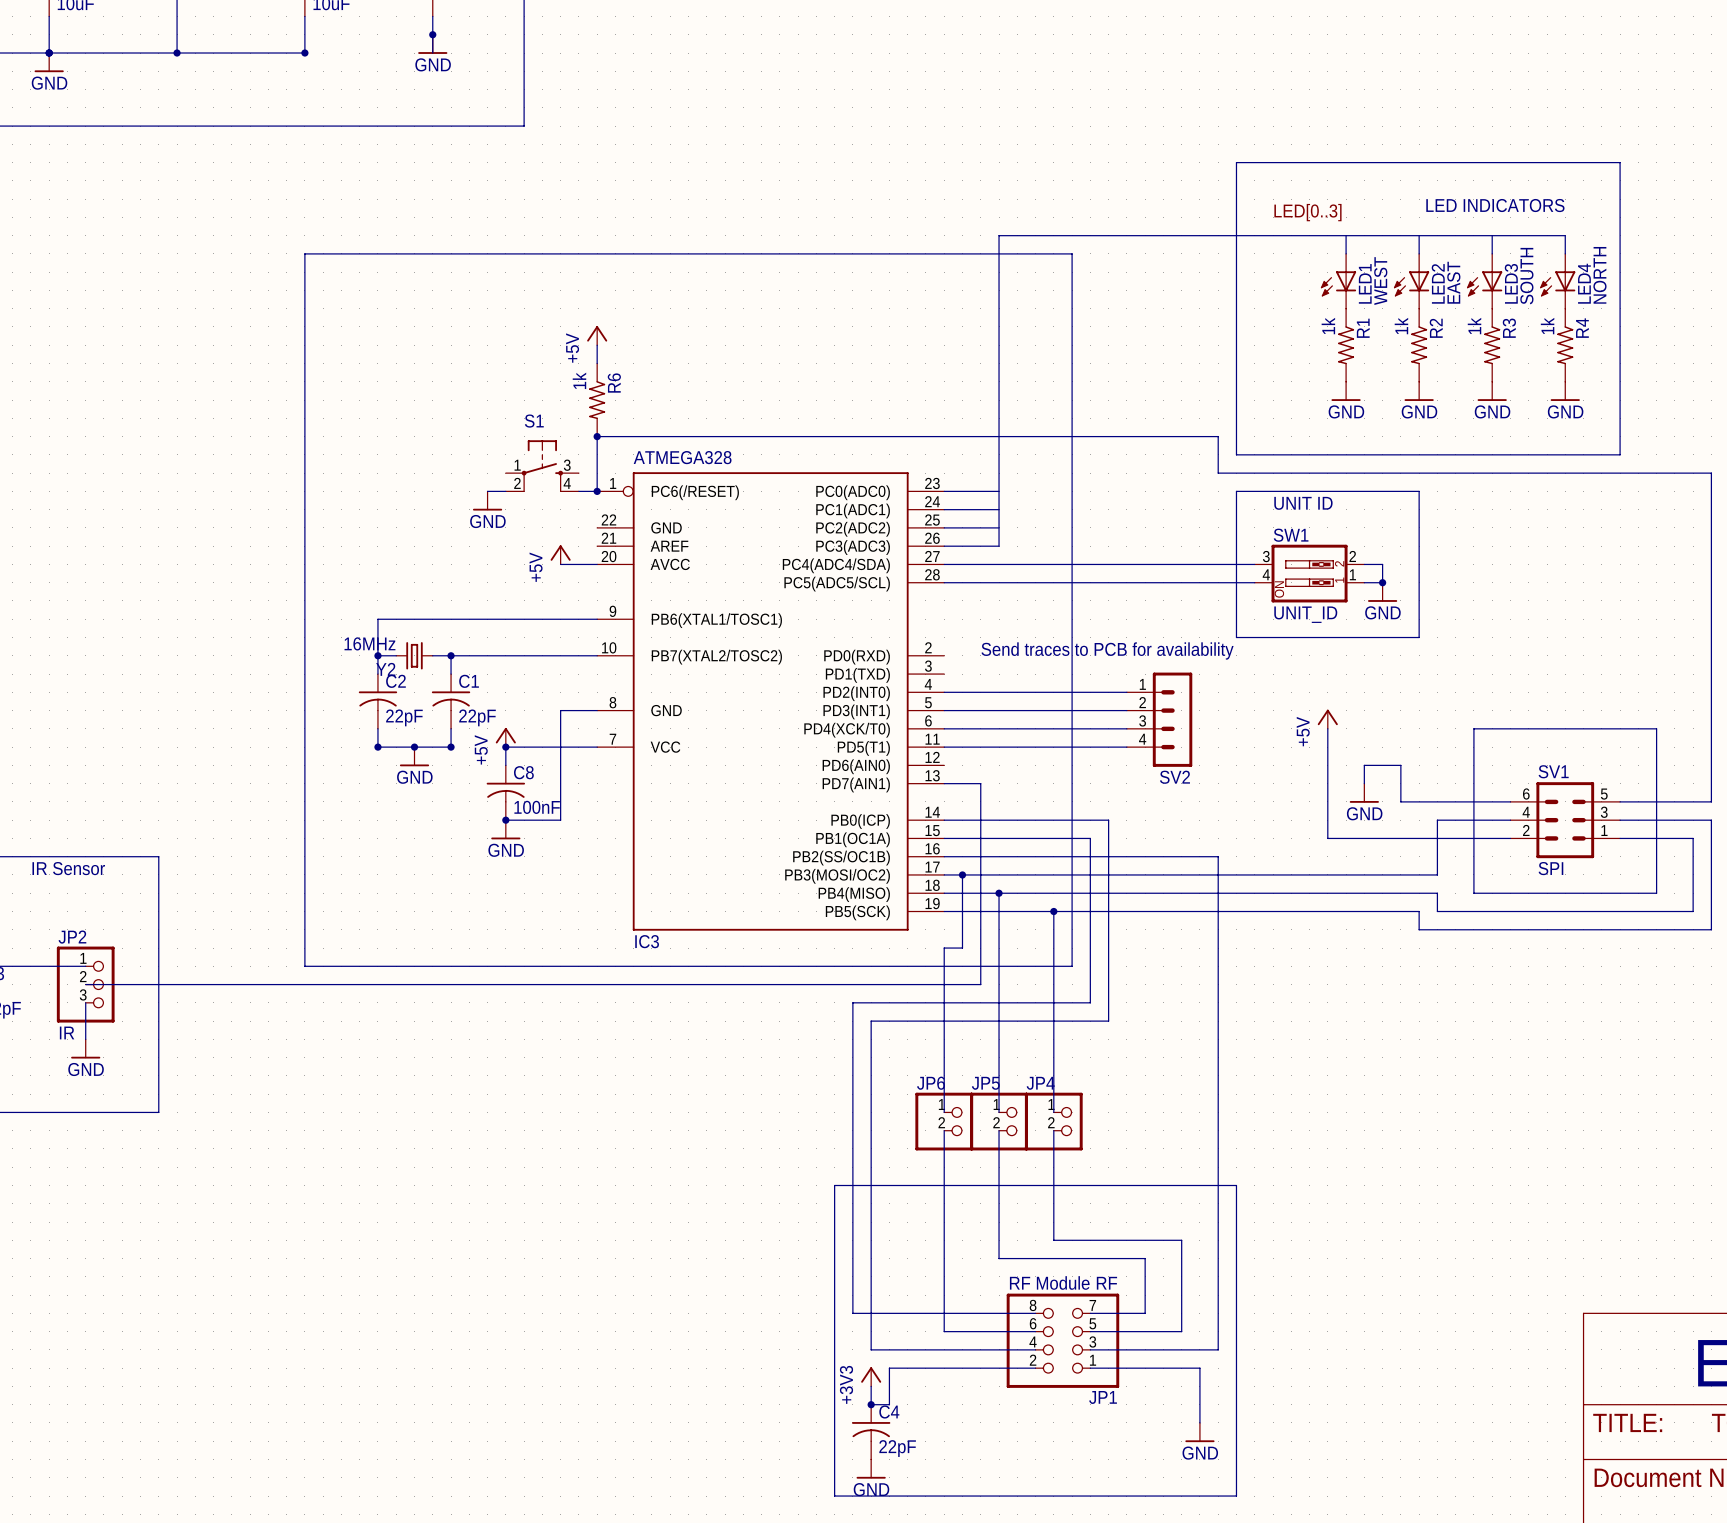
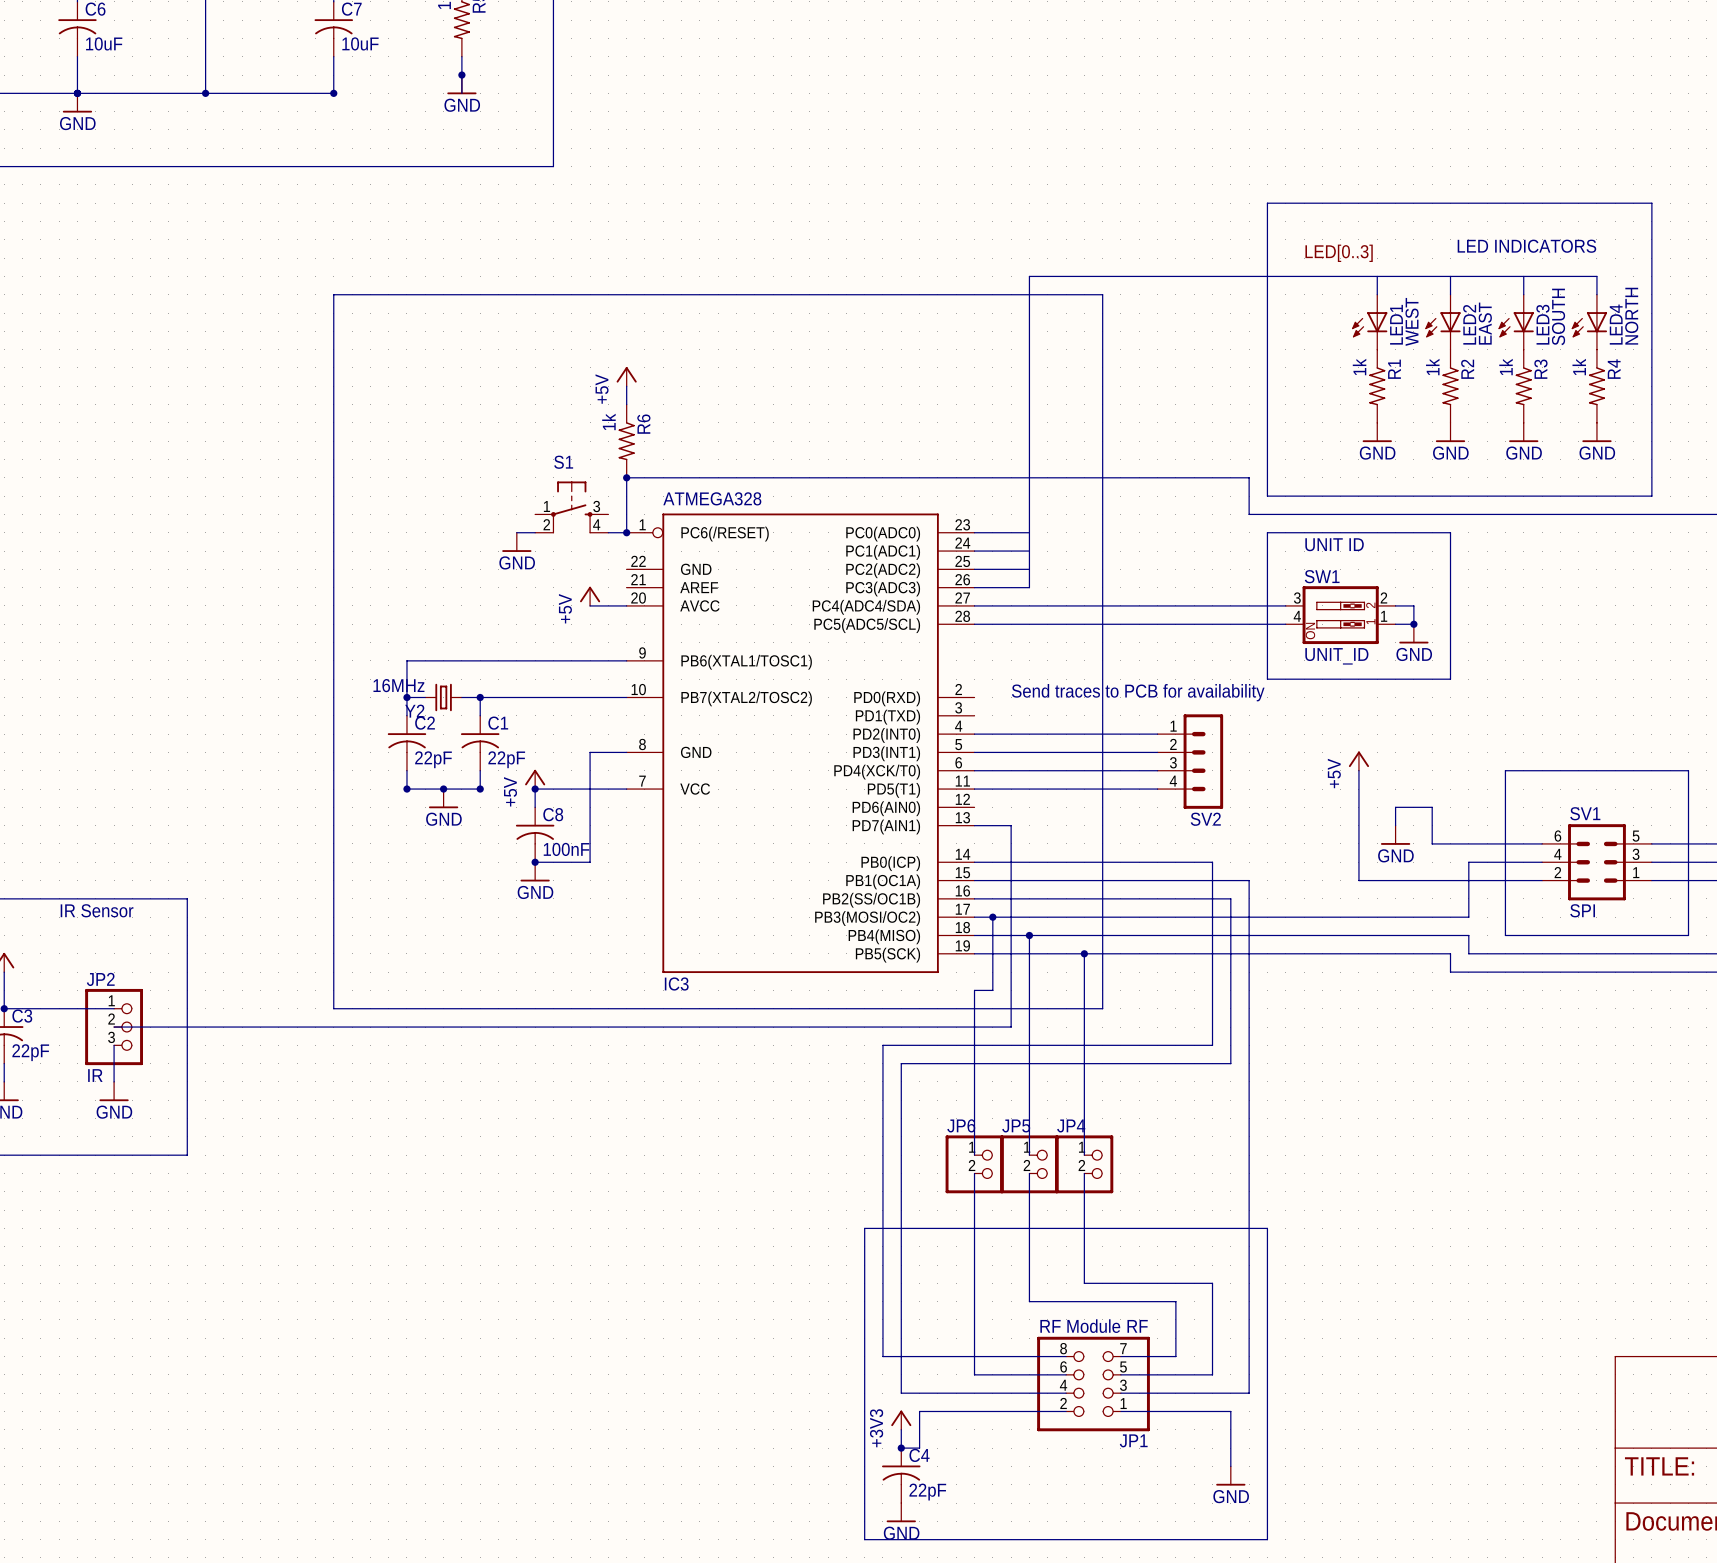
wire: (1108, 820) (1108, 1021) -> (1139, 862) (1212, 862) (1212, 1045) (1120, 1045)
wire: (1090, 838) (1090, 1002) -> none
wire: (1199, 856) (1218, 856) -> (1120, 880) (1249, 880) (1249, 898)
wire: none -> (1230, 898) (1230, 1063) (1139, 1063)

